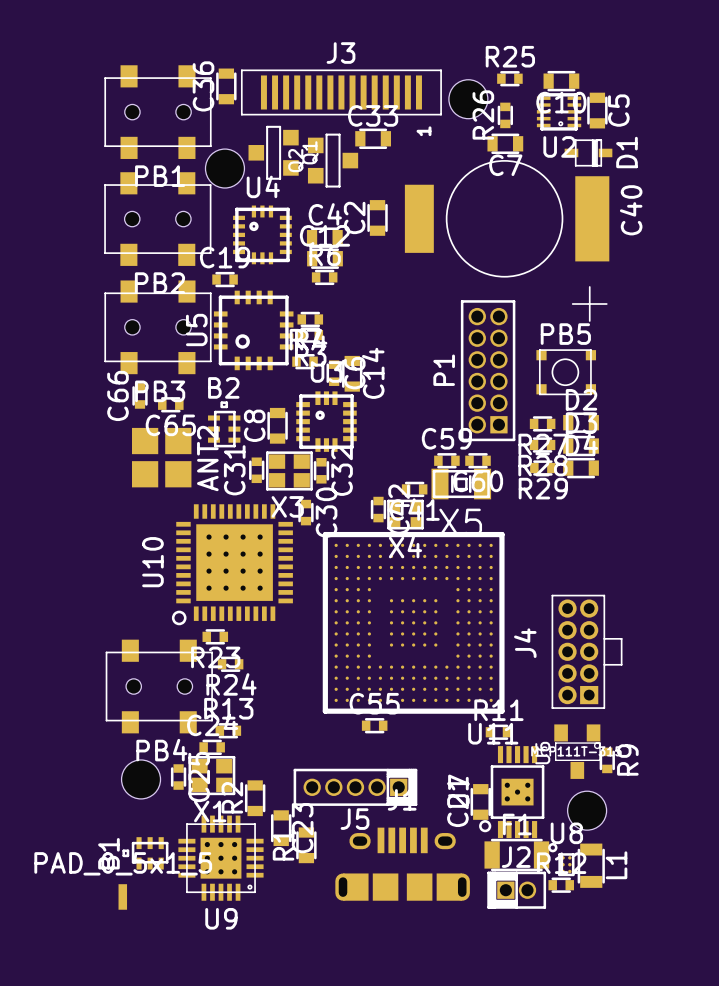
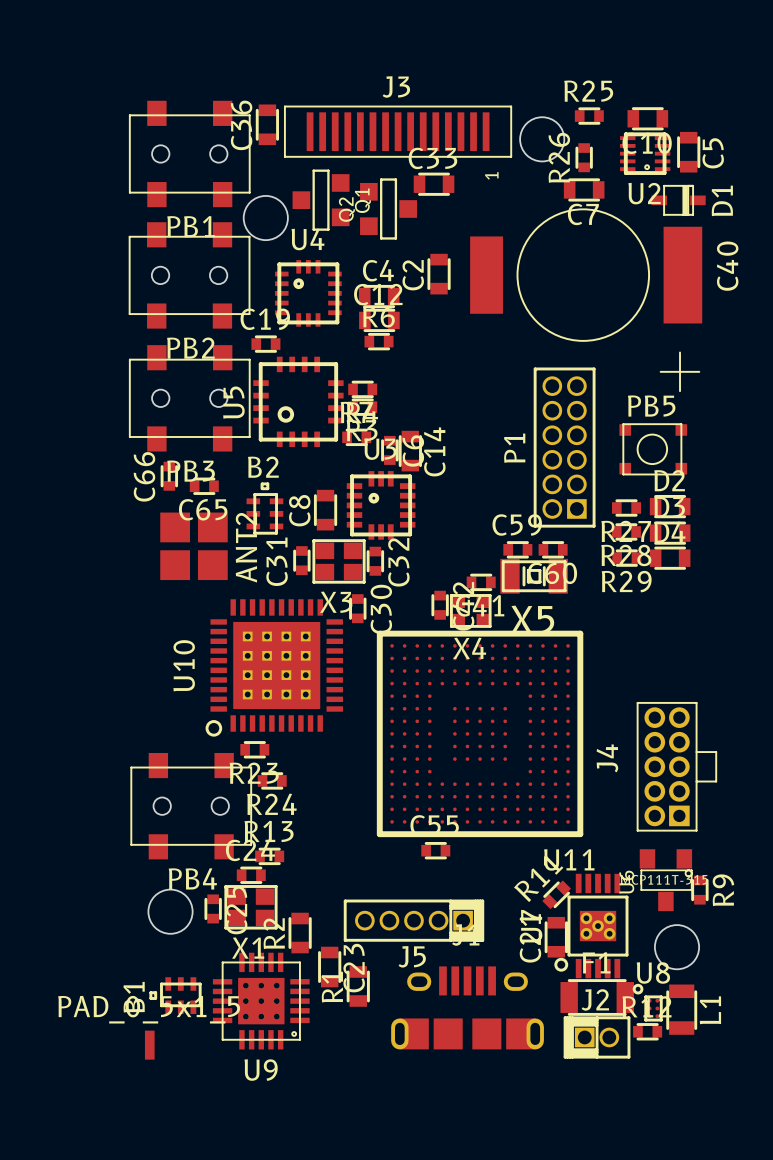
R11 rotation: 0° (498, 732) -> 45° counterclockwise (556, 894)
R11 position: (498, 732) -> (556, 894)

